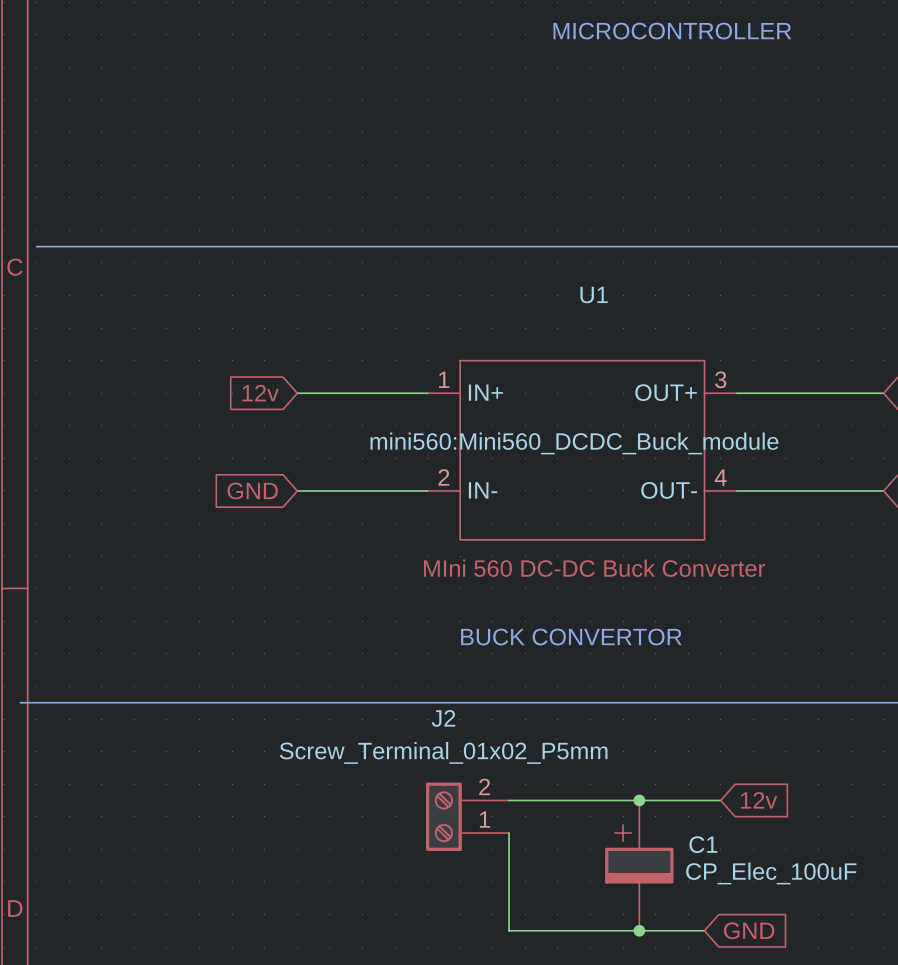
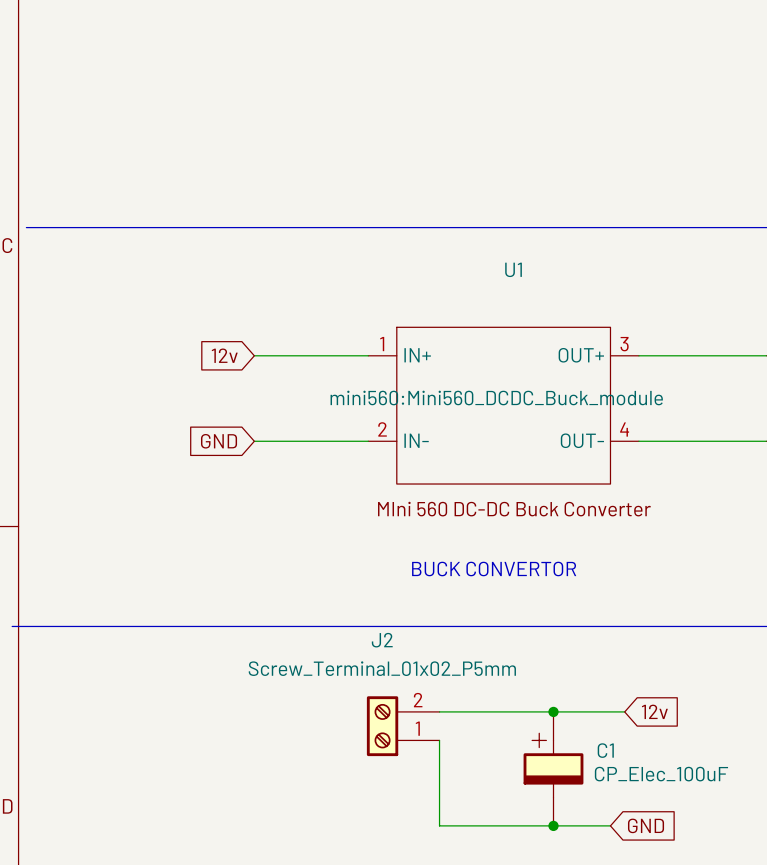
text: MICROCONTROLLER (672, 31) -> none

